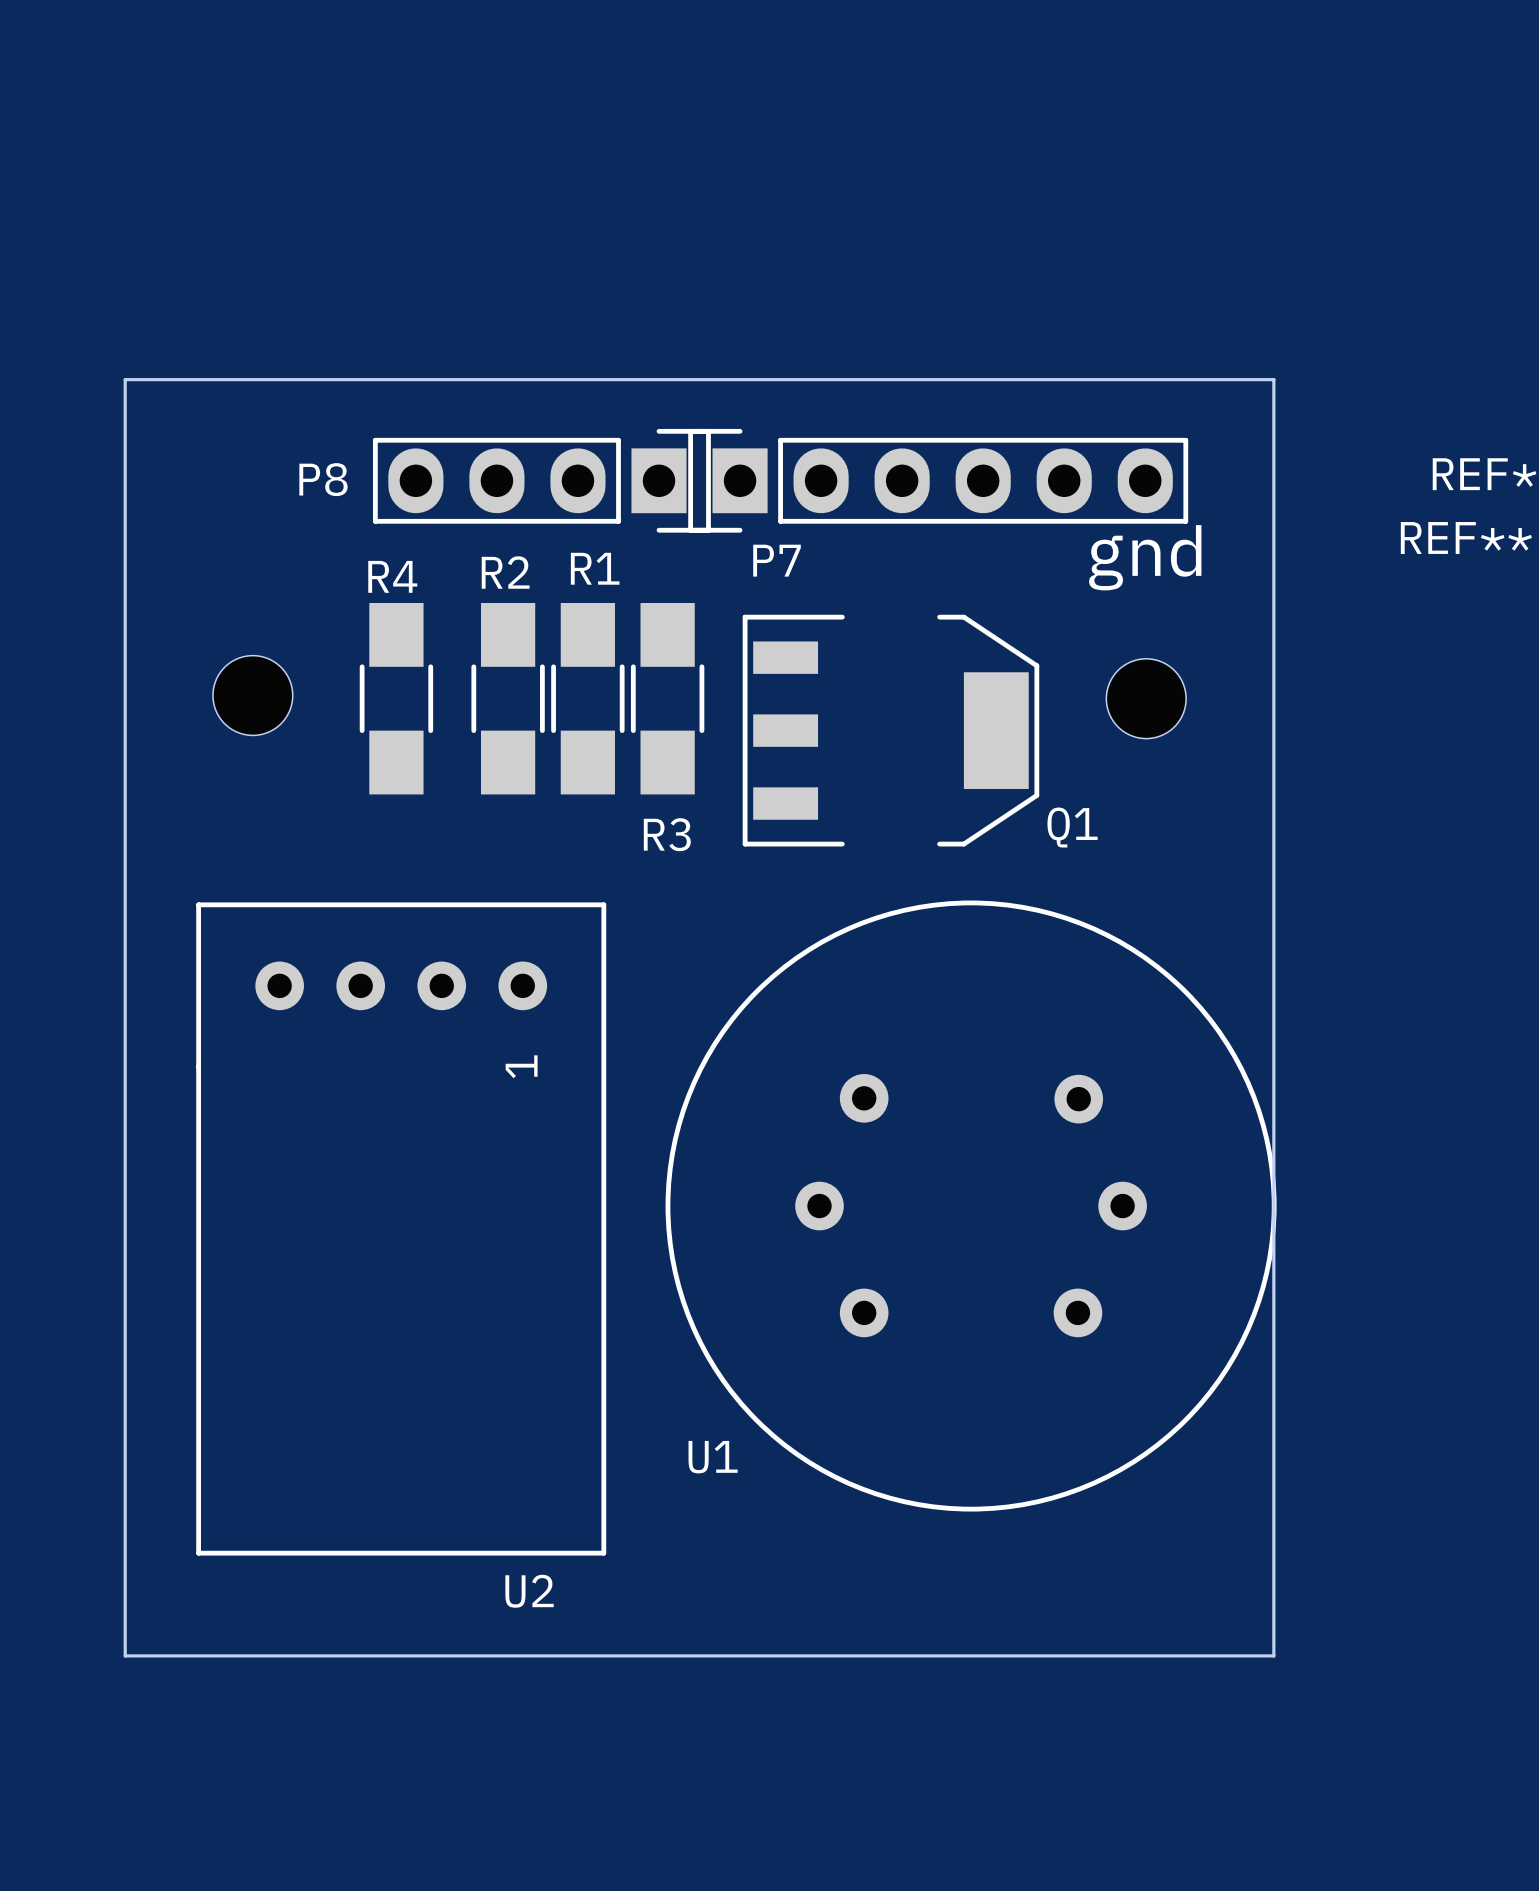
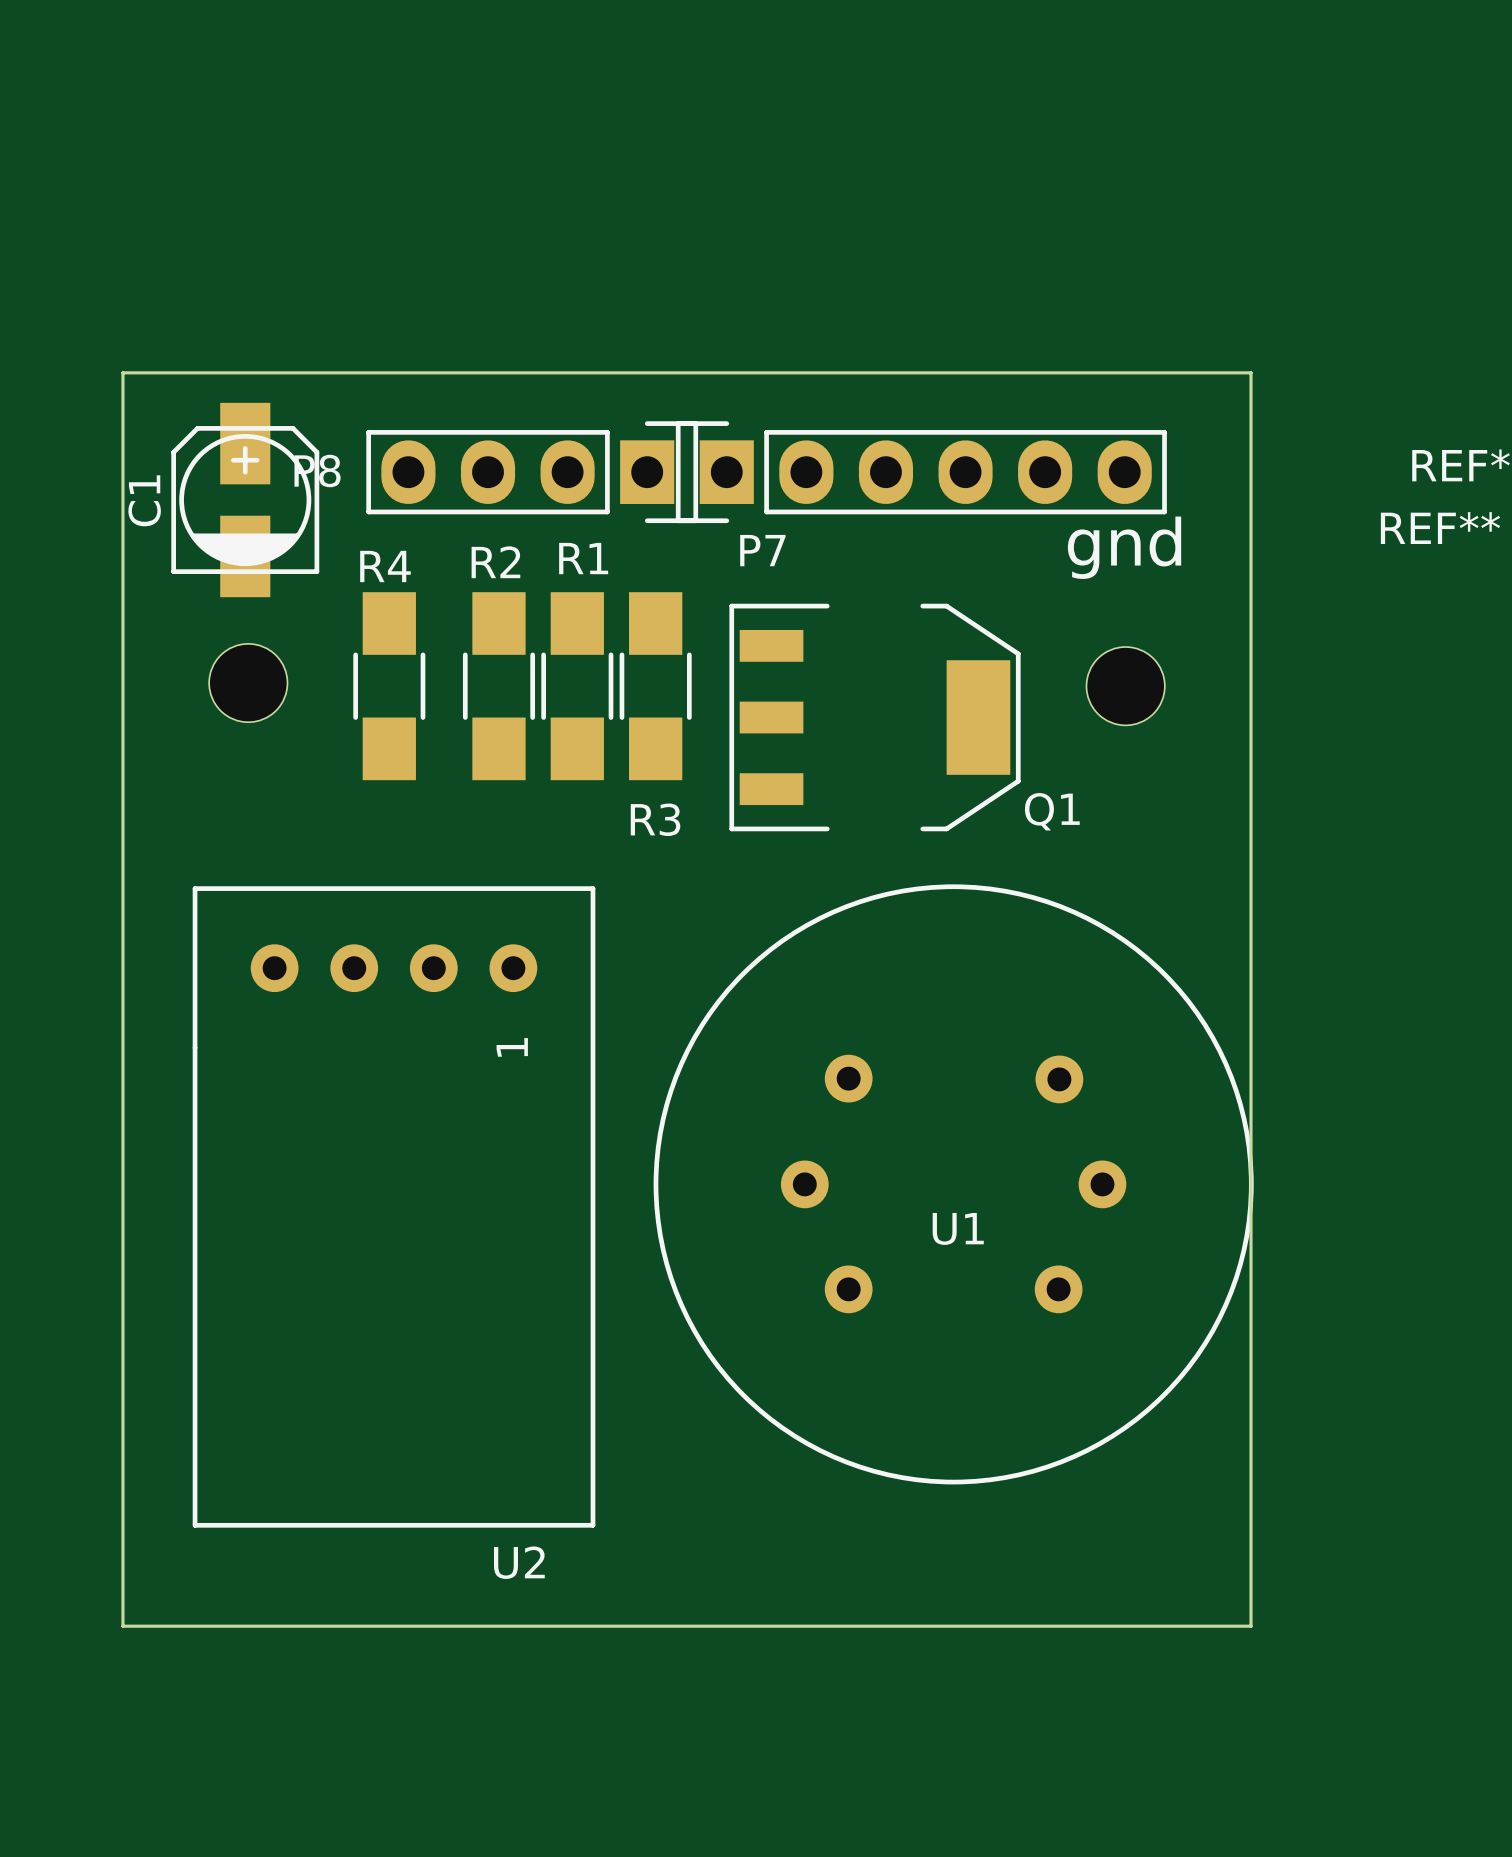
C1: none -> (245, 500)
U1 name position: U1 (713, 1457) -> U1 (958, 1228)

